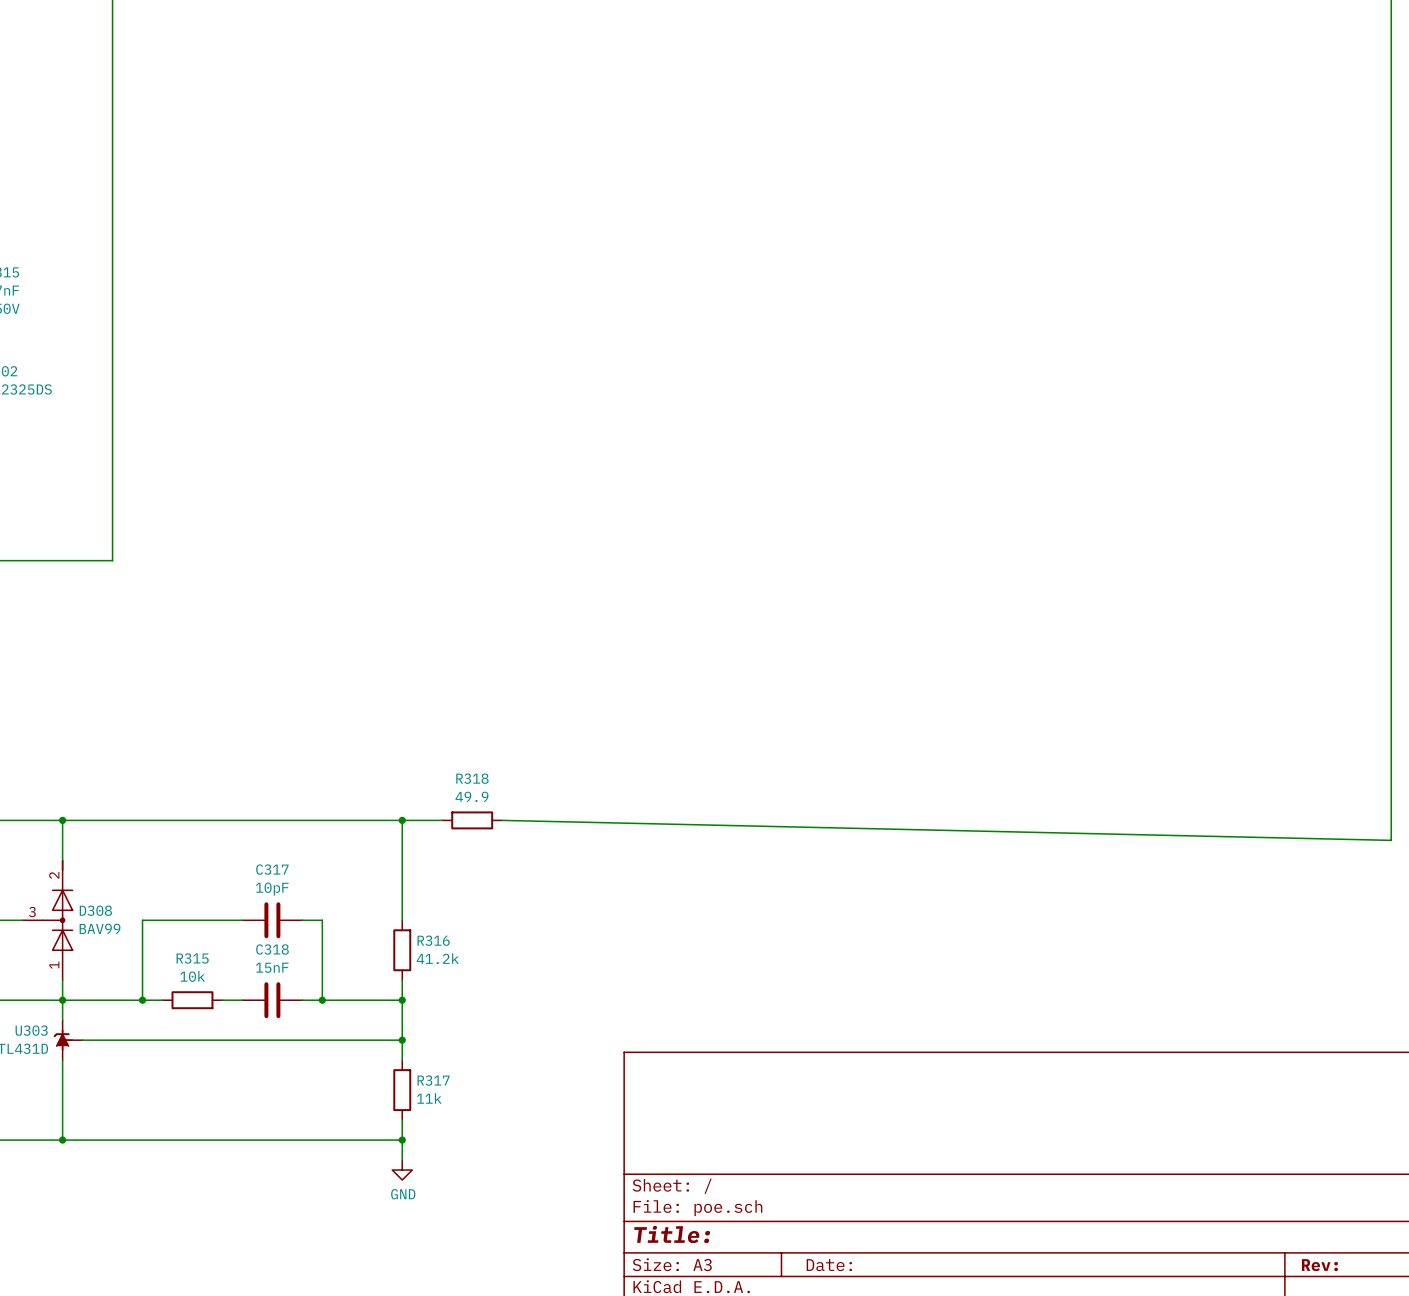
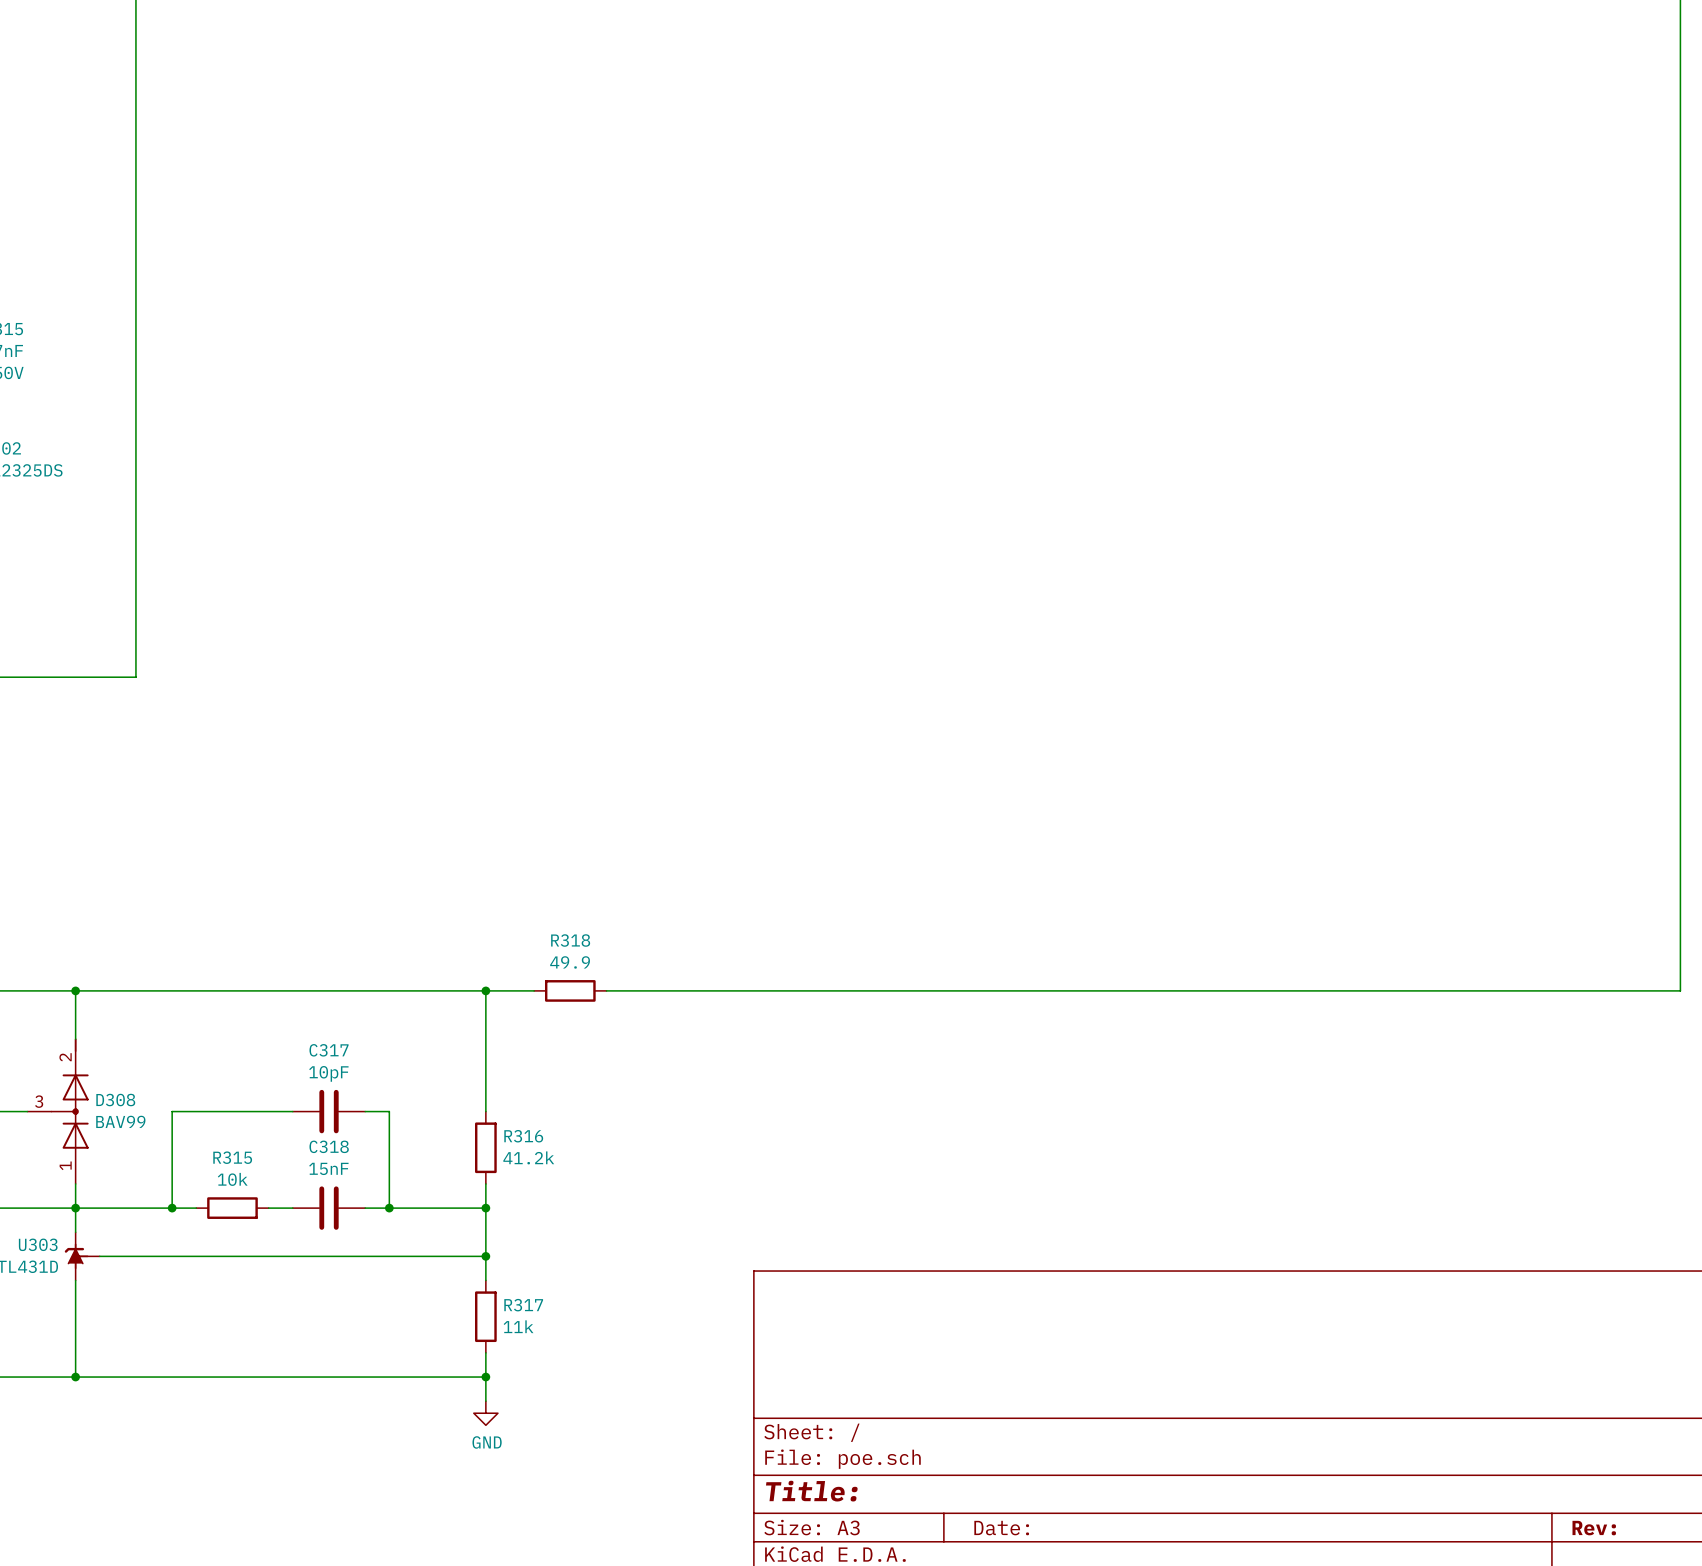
wire: (502, 820) (1391, 840) (1391, 820) -> (606, 990) (1680, 990)

